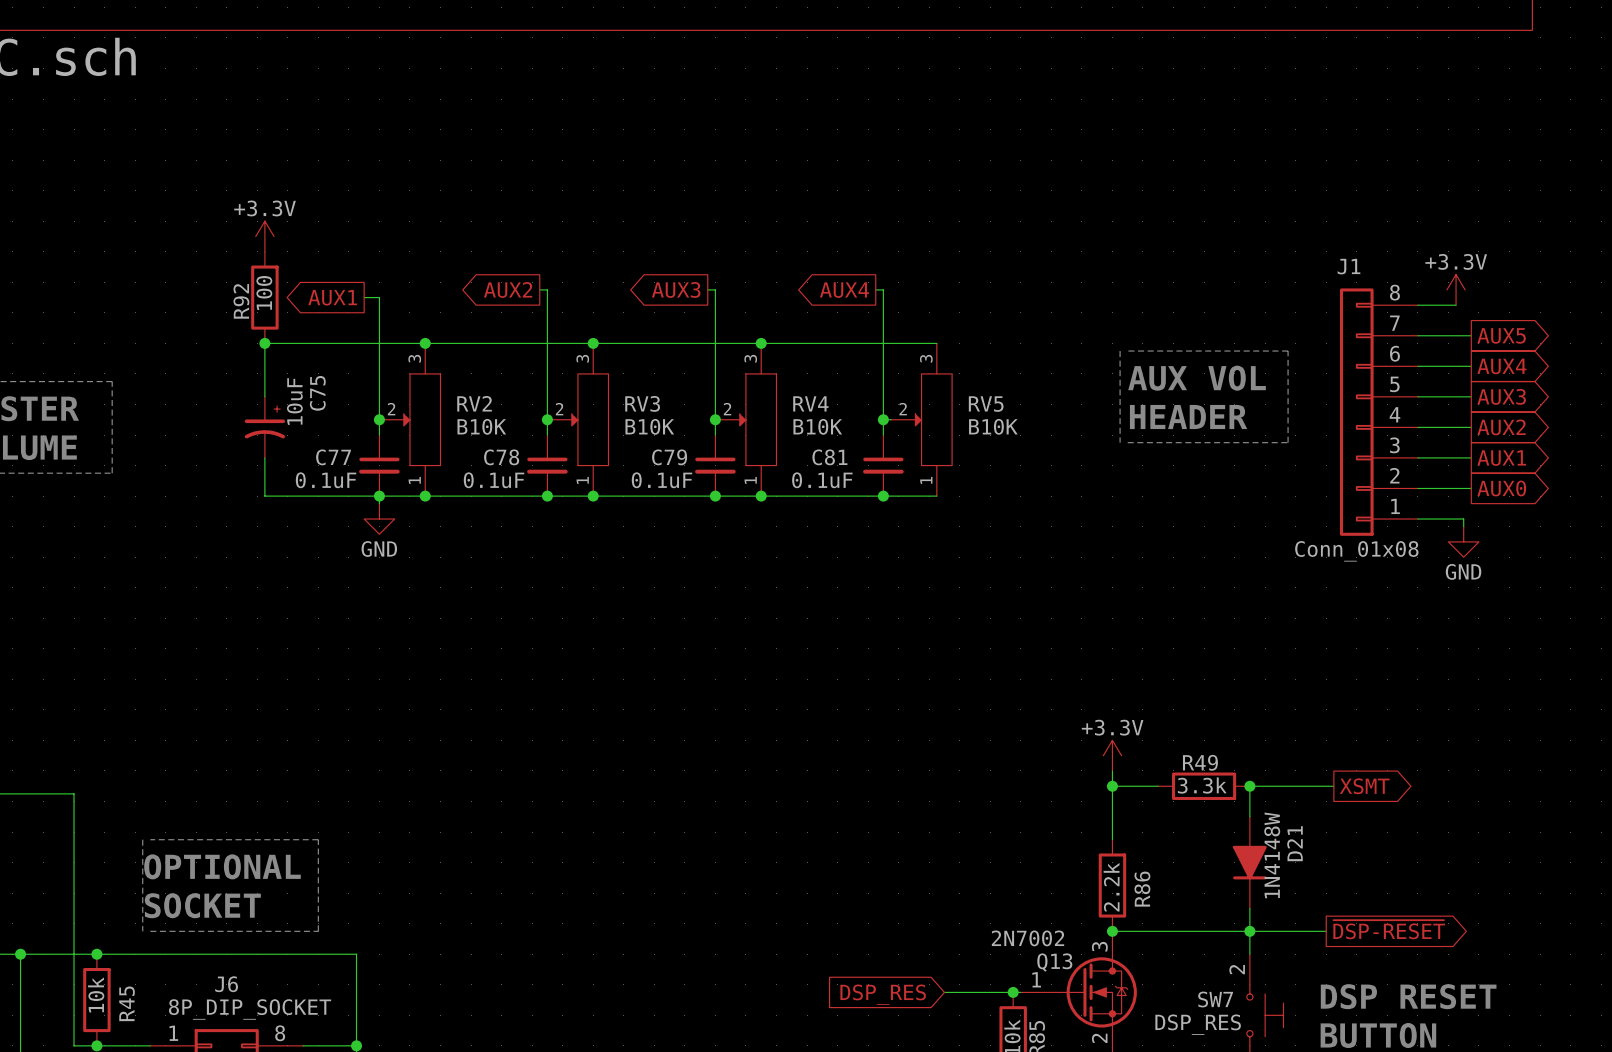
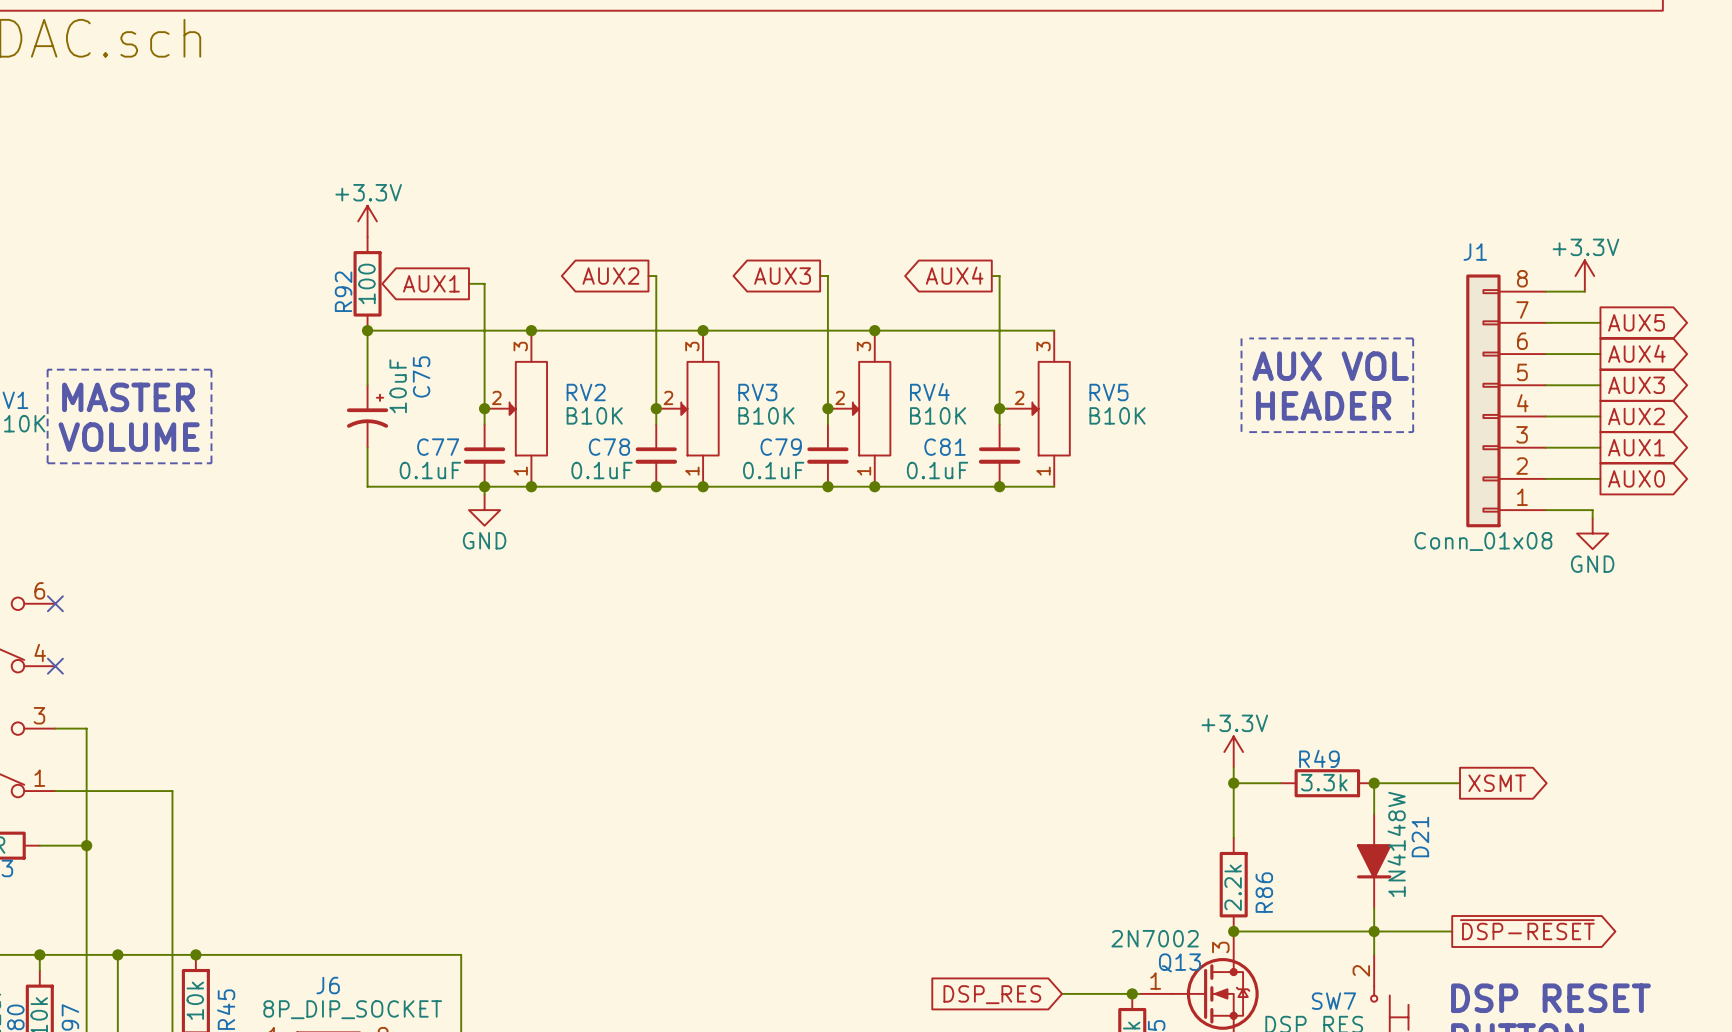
line: (142, 839) (142, 931) -> none
line: (150, 839) (318, 839) (318, 931) (150, 931) -> none
text: OPTIONAL (222, 866) -> none
text: SOCKET (202, 905) -> none

